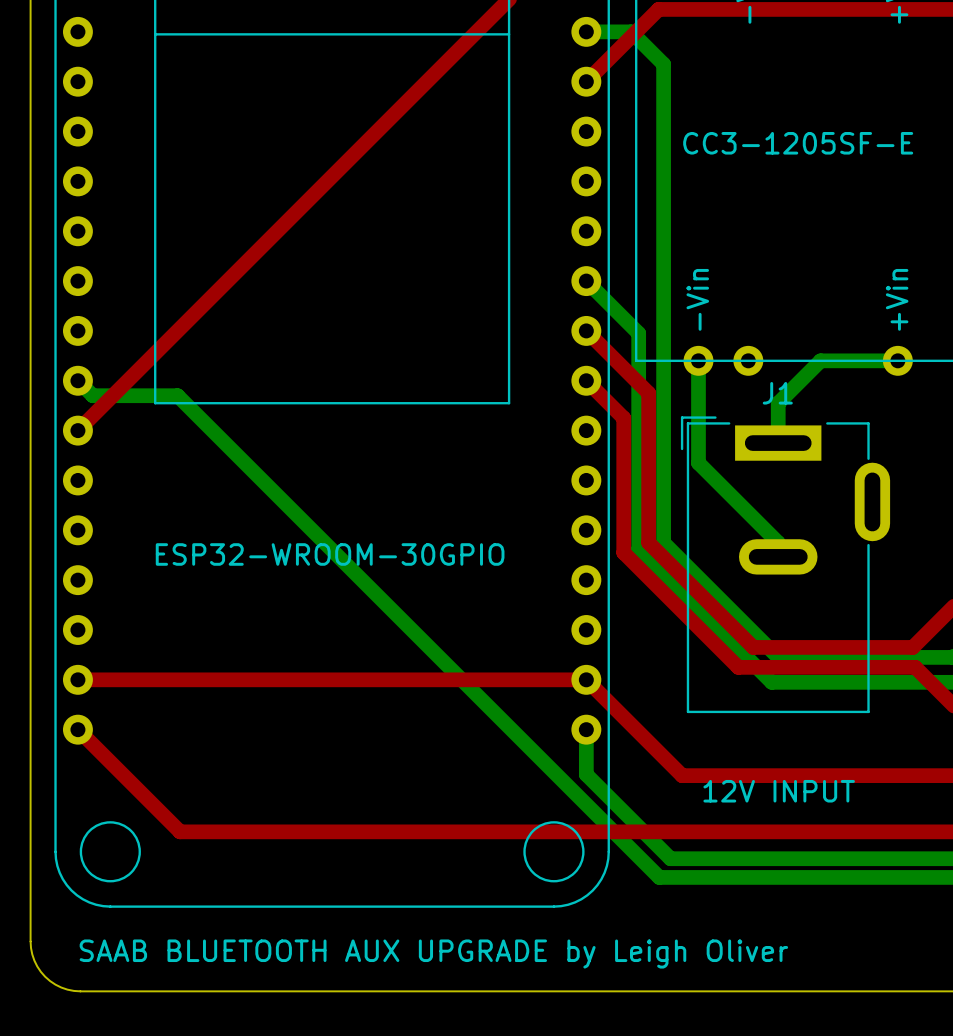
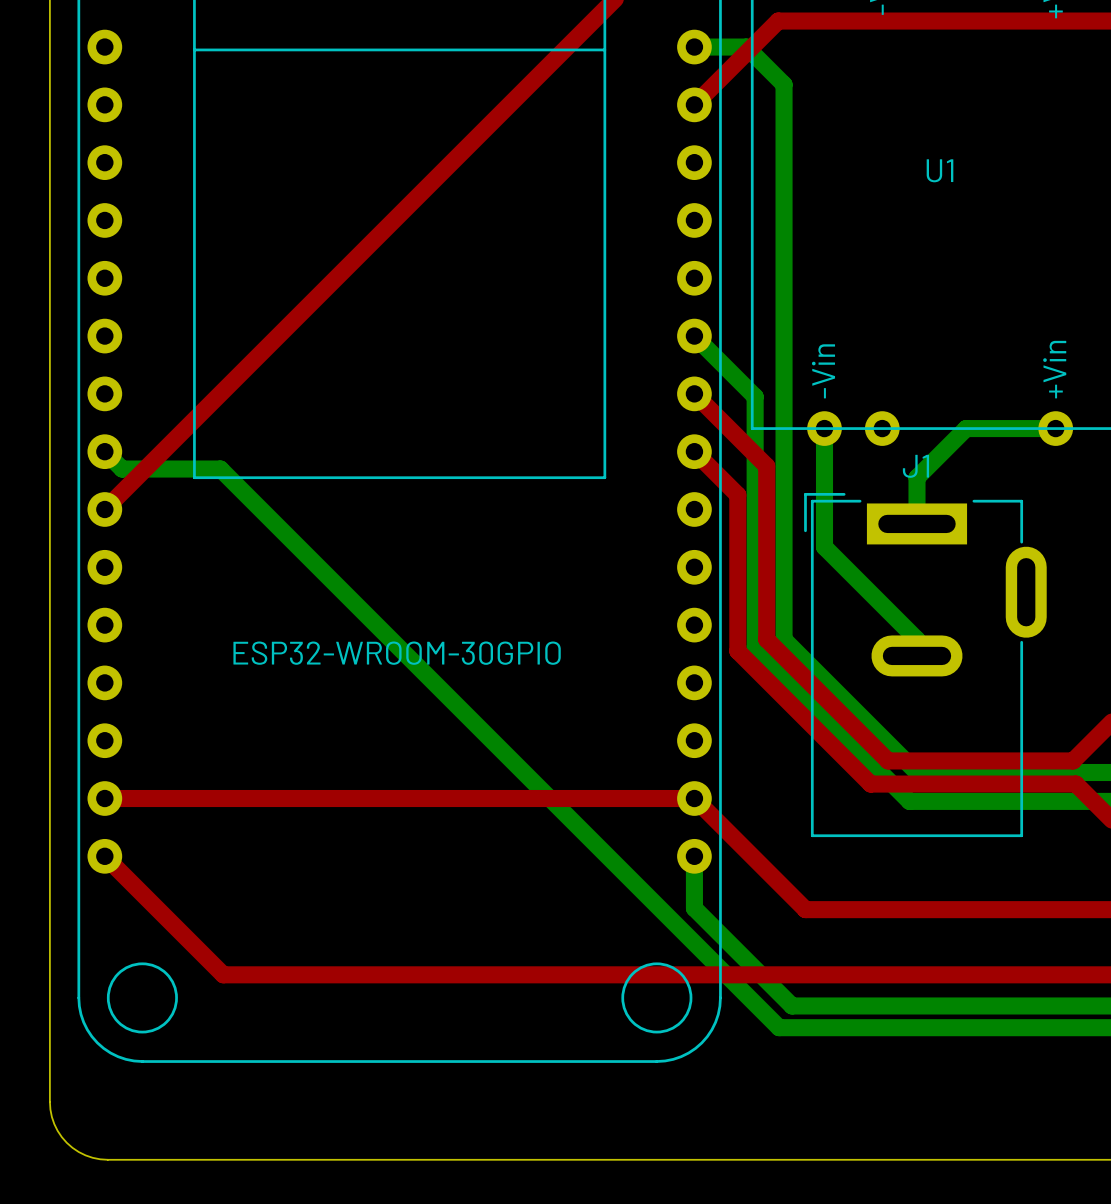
U1 name: none -> U1 (940, 170)
U1 value: CC3-1205SF-E (798, 143) -> none
text: 12V INPUT (779, 791) -> none
text: SAAB BLUETOOTH AUX UPGRADE by Leigh Oliver (433, 954) -> none

